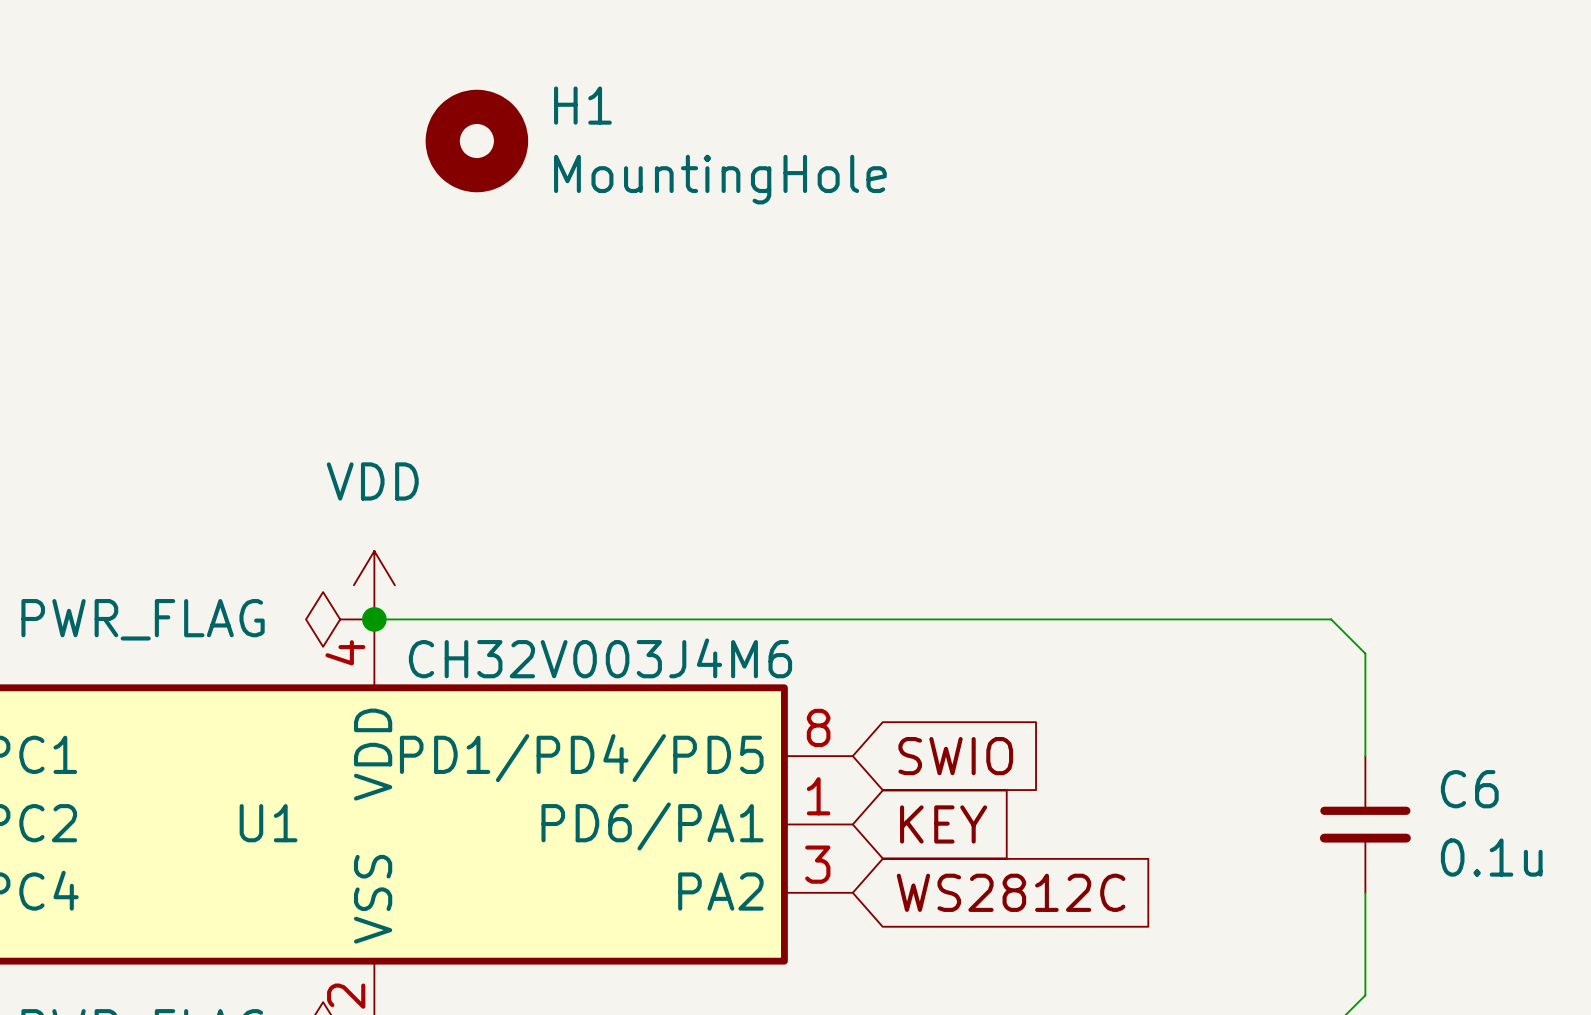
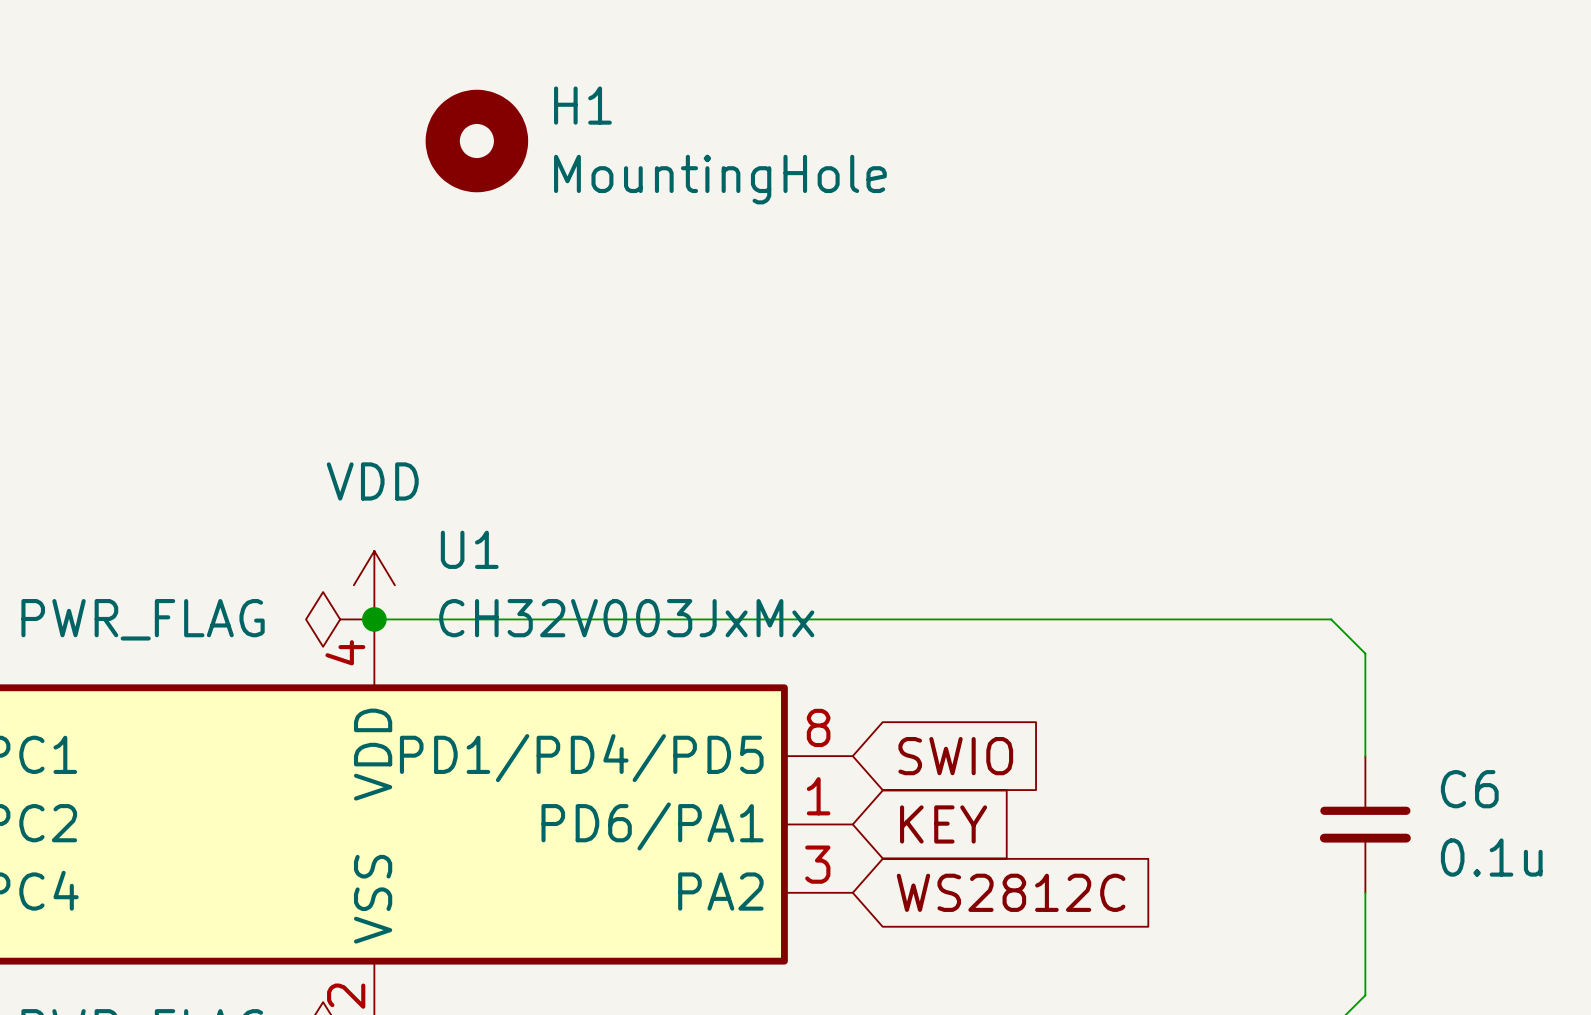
U1 value: CH32V003J4M6 (600, 658) -> CH32V003JxMx (626, 618)
U1 name position: U1 (268, 823) -> U1 (469, 549)

